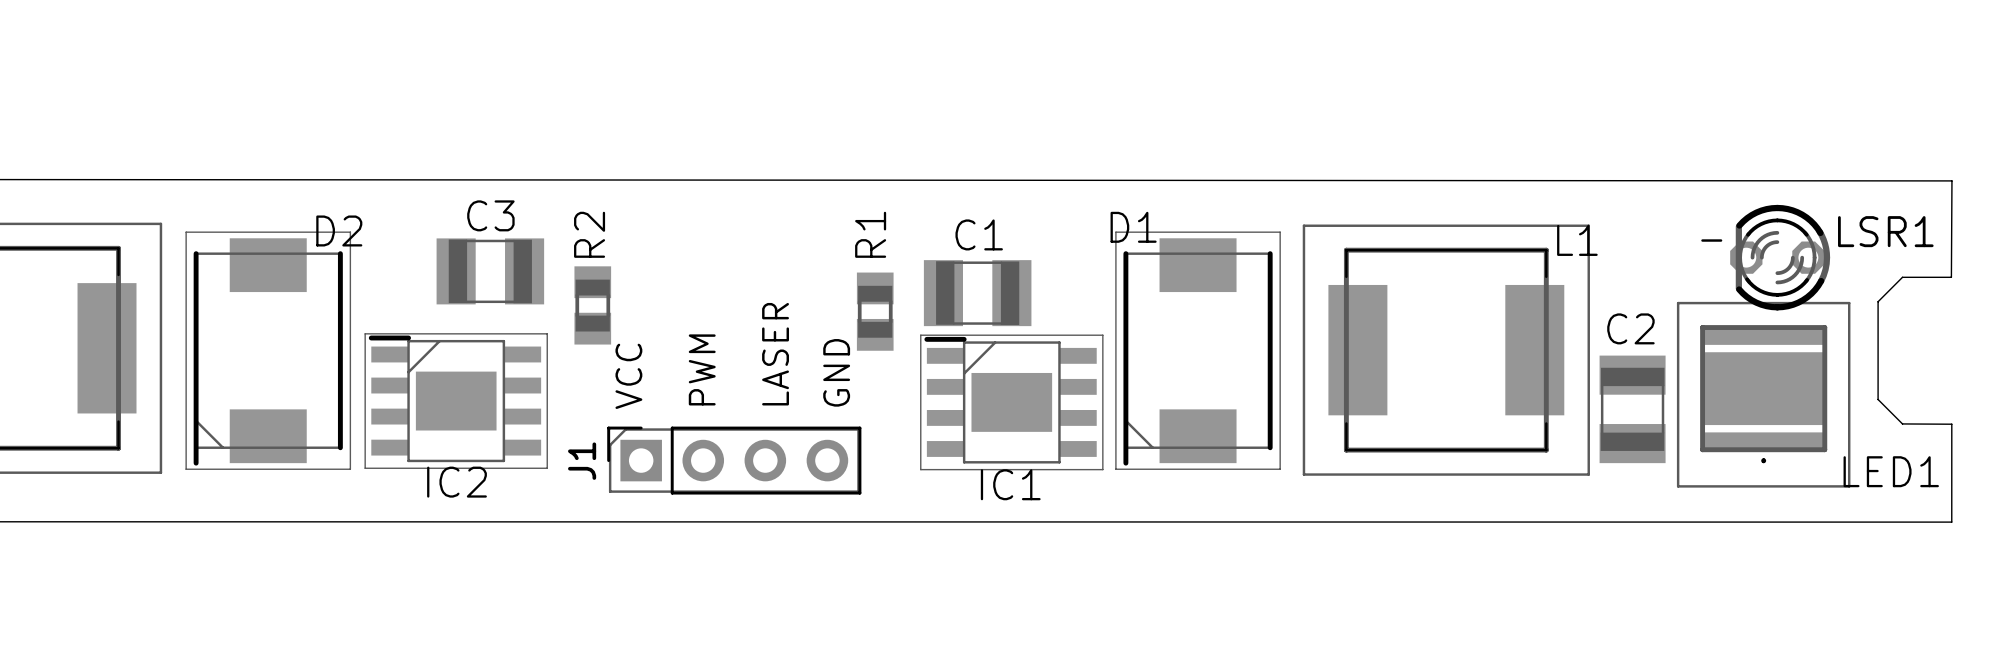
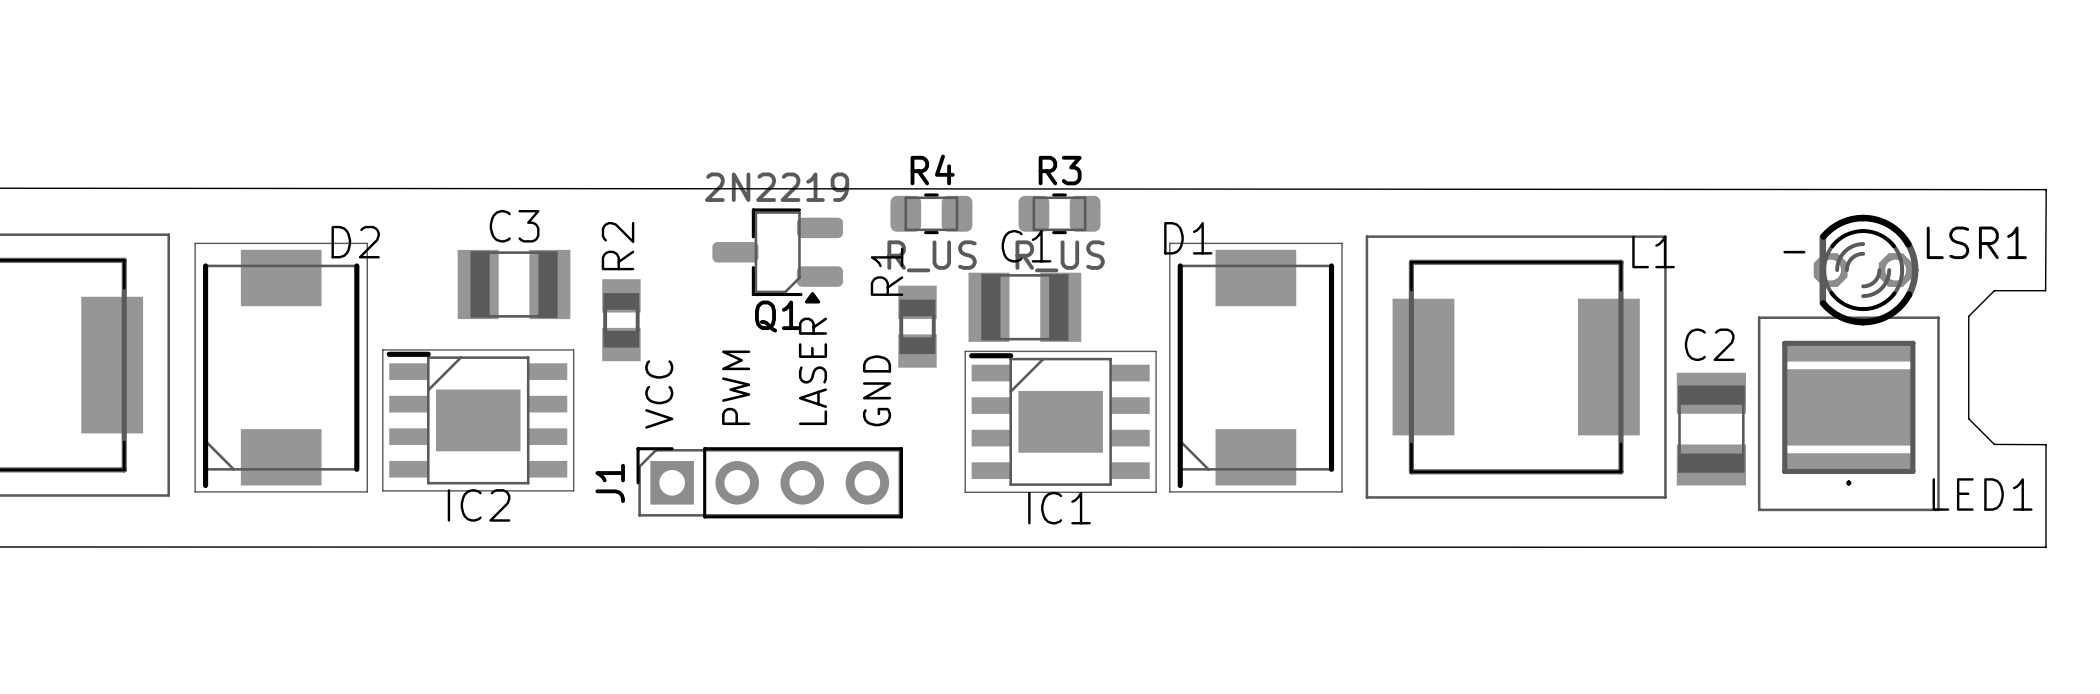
R4: none -> R_US (931, 213)
R3: none -> R_US (1059, 213)
R1 name position: R1 (870, 234) -> R1 (887, 271)
Q1: none -> 2N2219 (777, 255)

